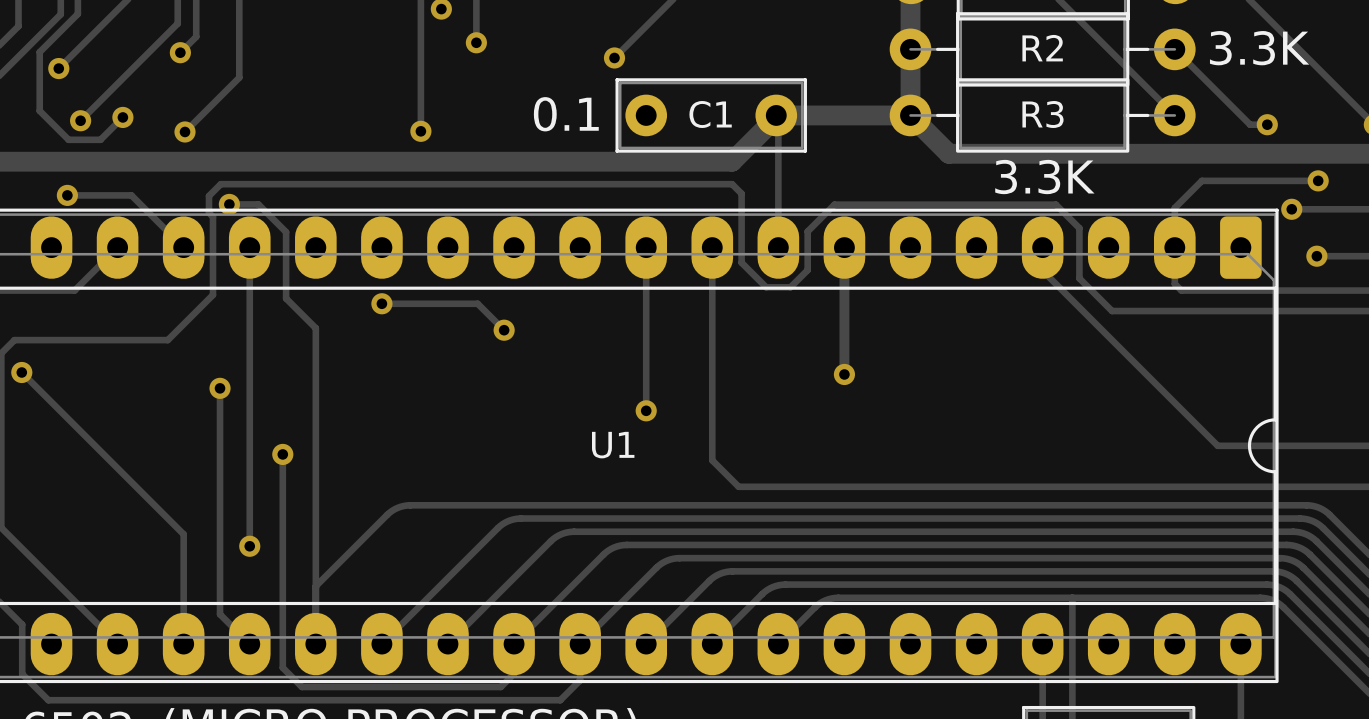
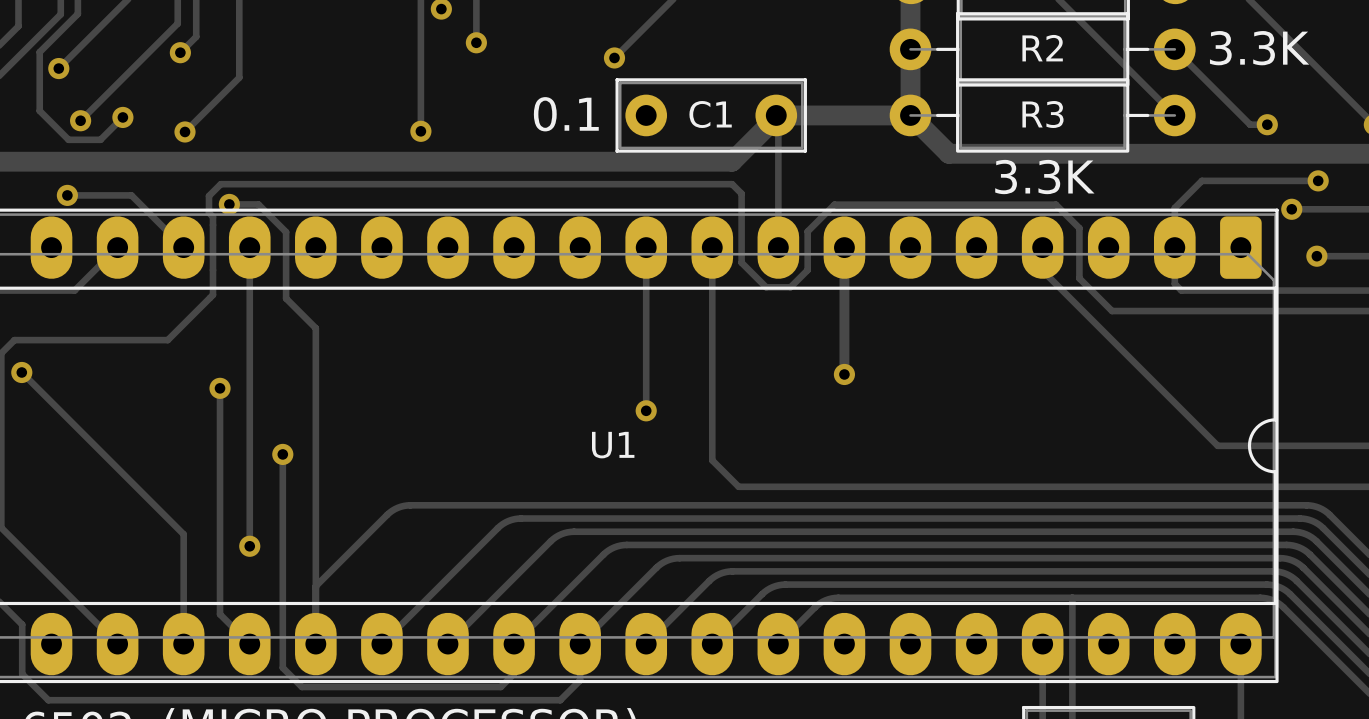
track: (381, 303) (477, 303) (504, 330) -> none
via: (381, 303) -> none
via: (504, 330) -> none

